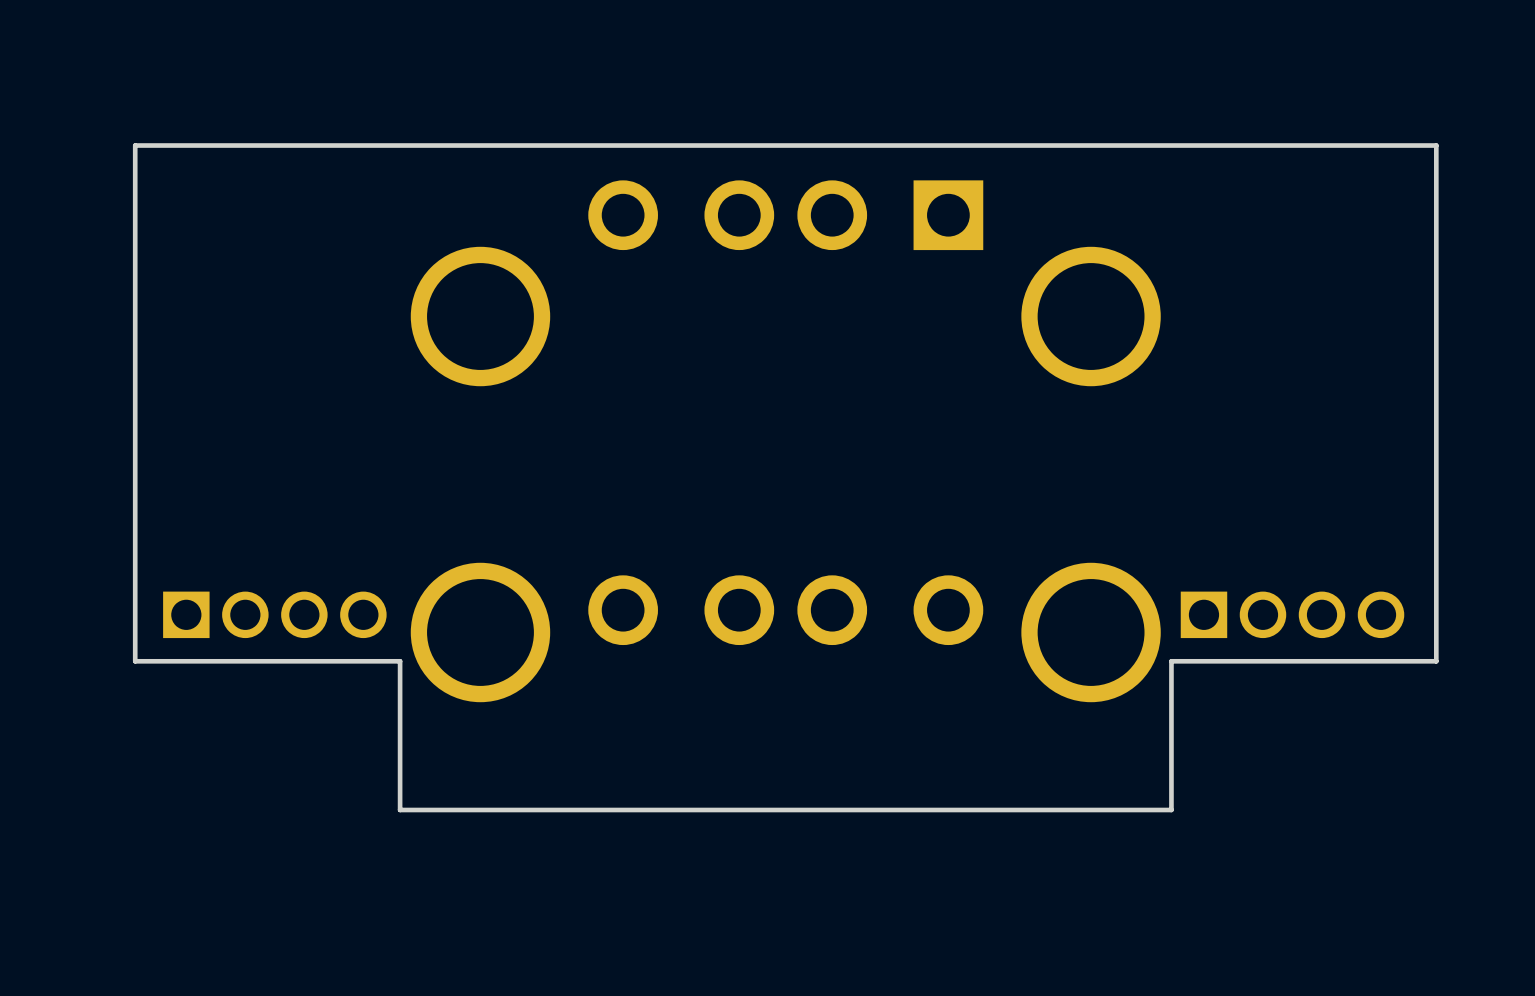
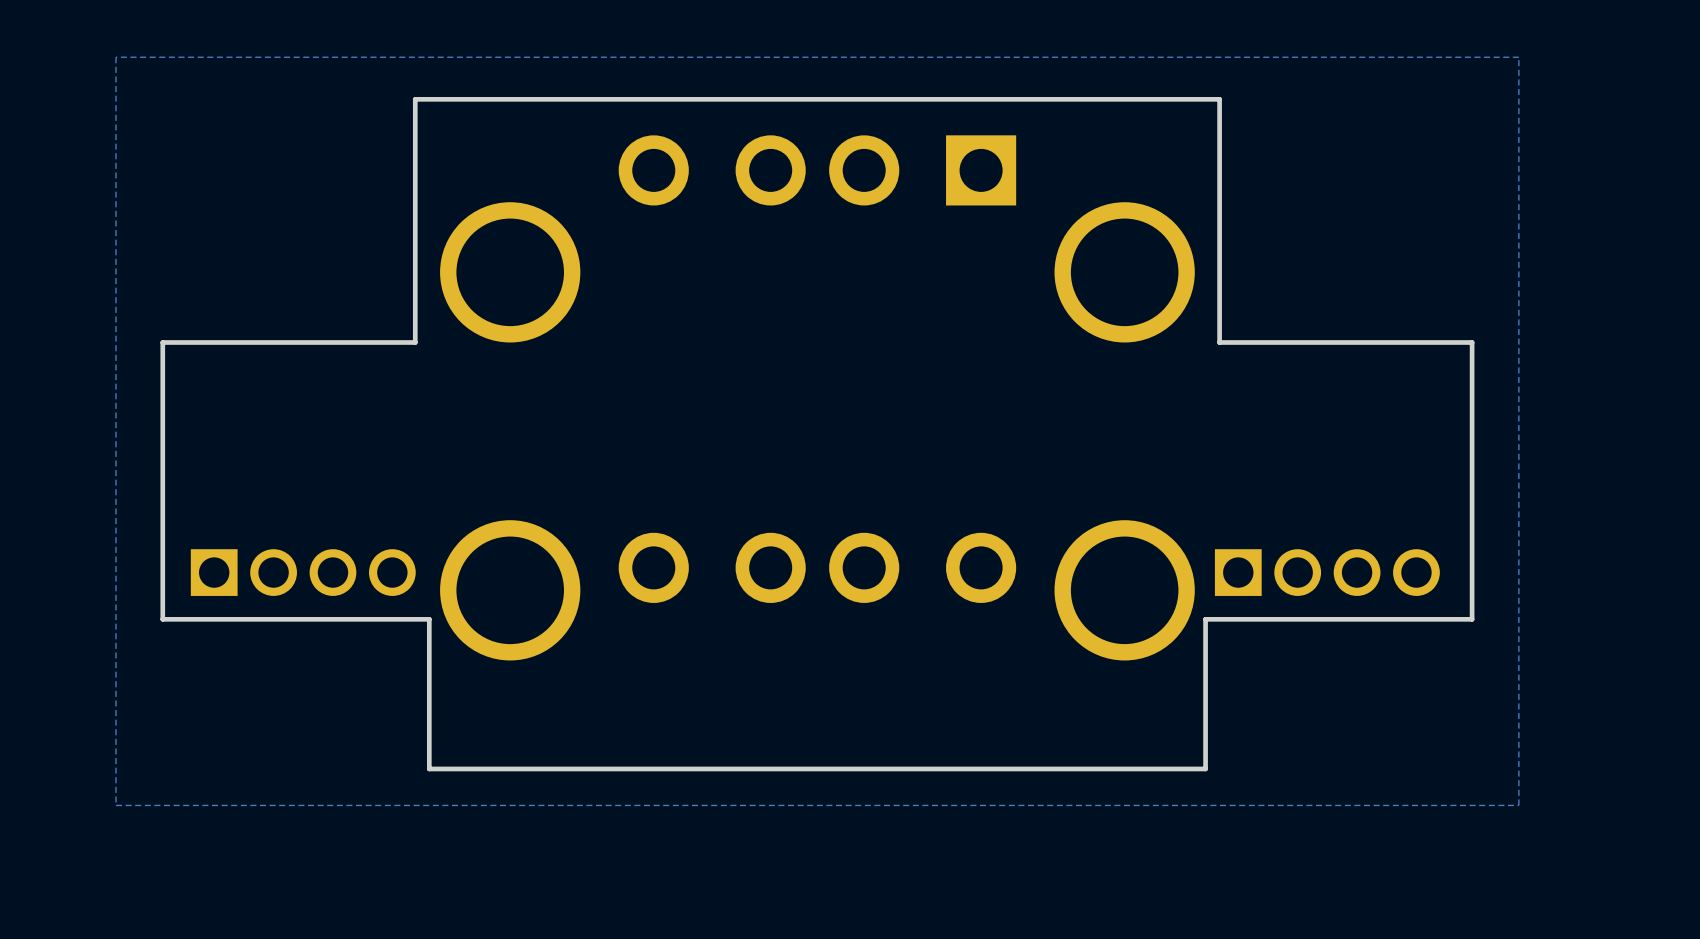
zone outline: none -> (1518, 57) (1518, 805) (116, 805) (116, 57) (1518, 57)
board edge: (1436, 386) (1436, 145) (135, 145) (135, 386) -> (1472, 342) (1219, 342) (1219, 99) (415, 99) (415, 342) (162, 342)

